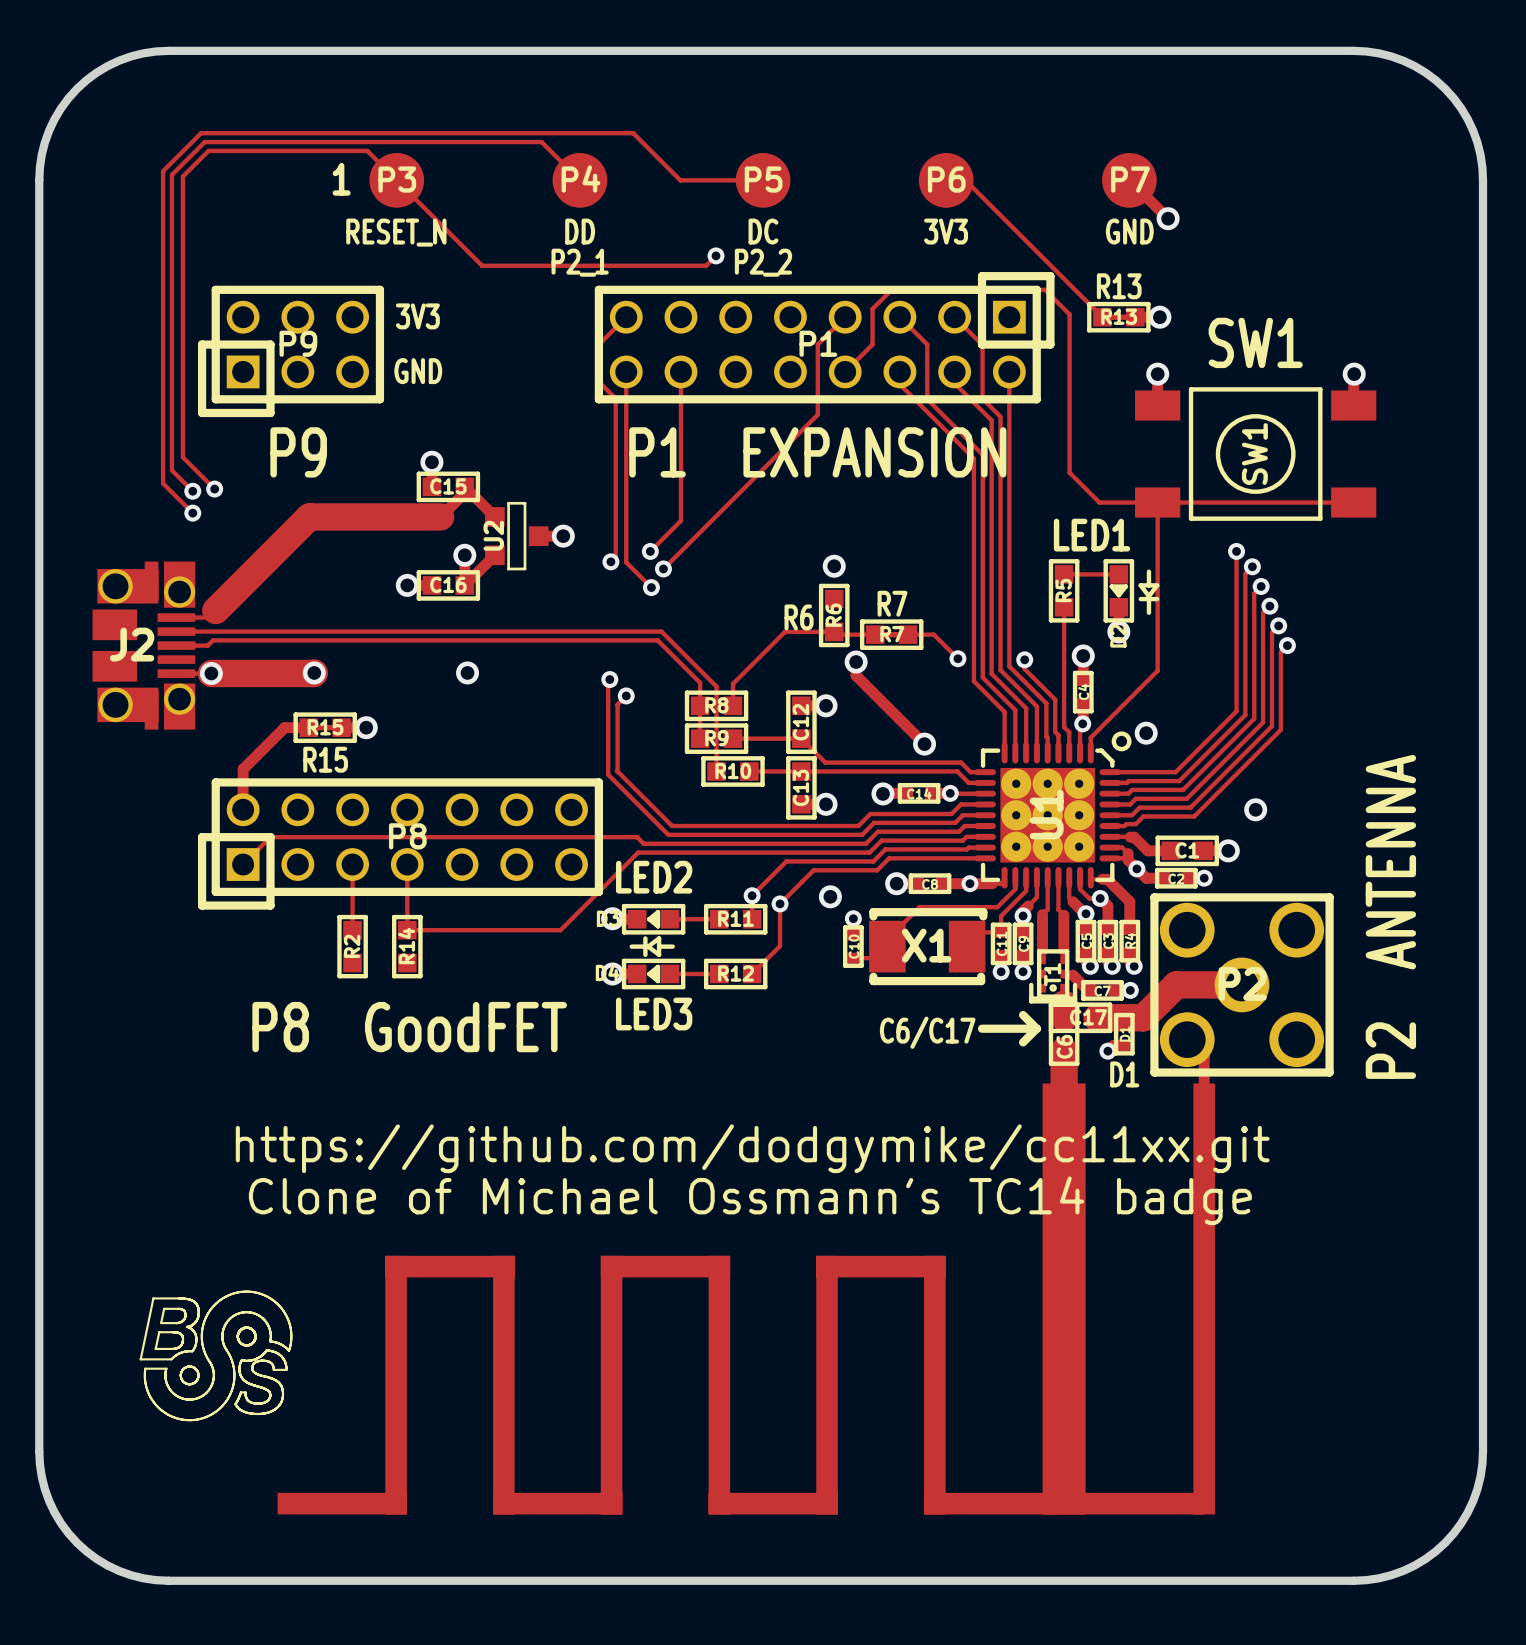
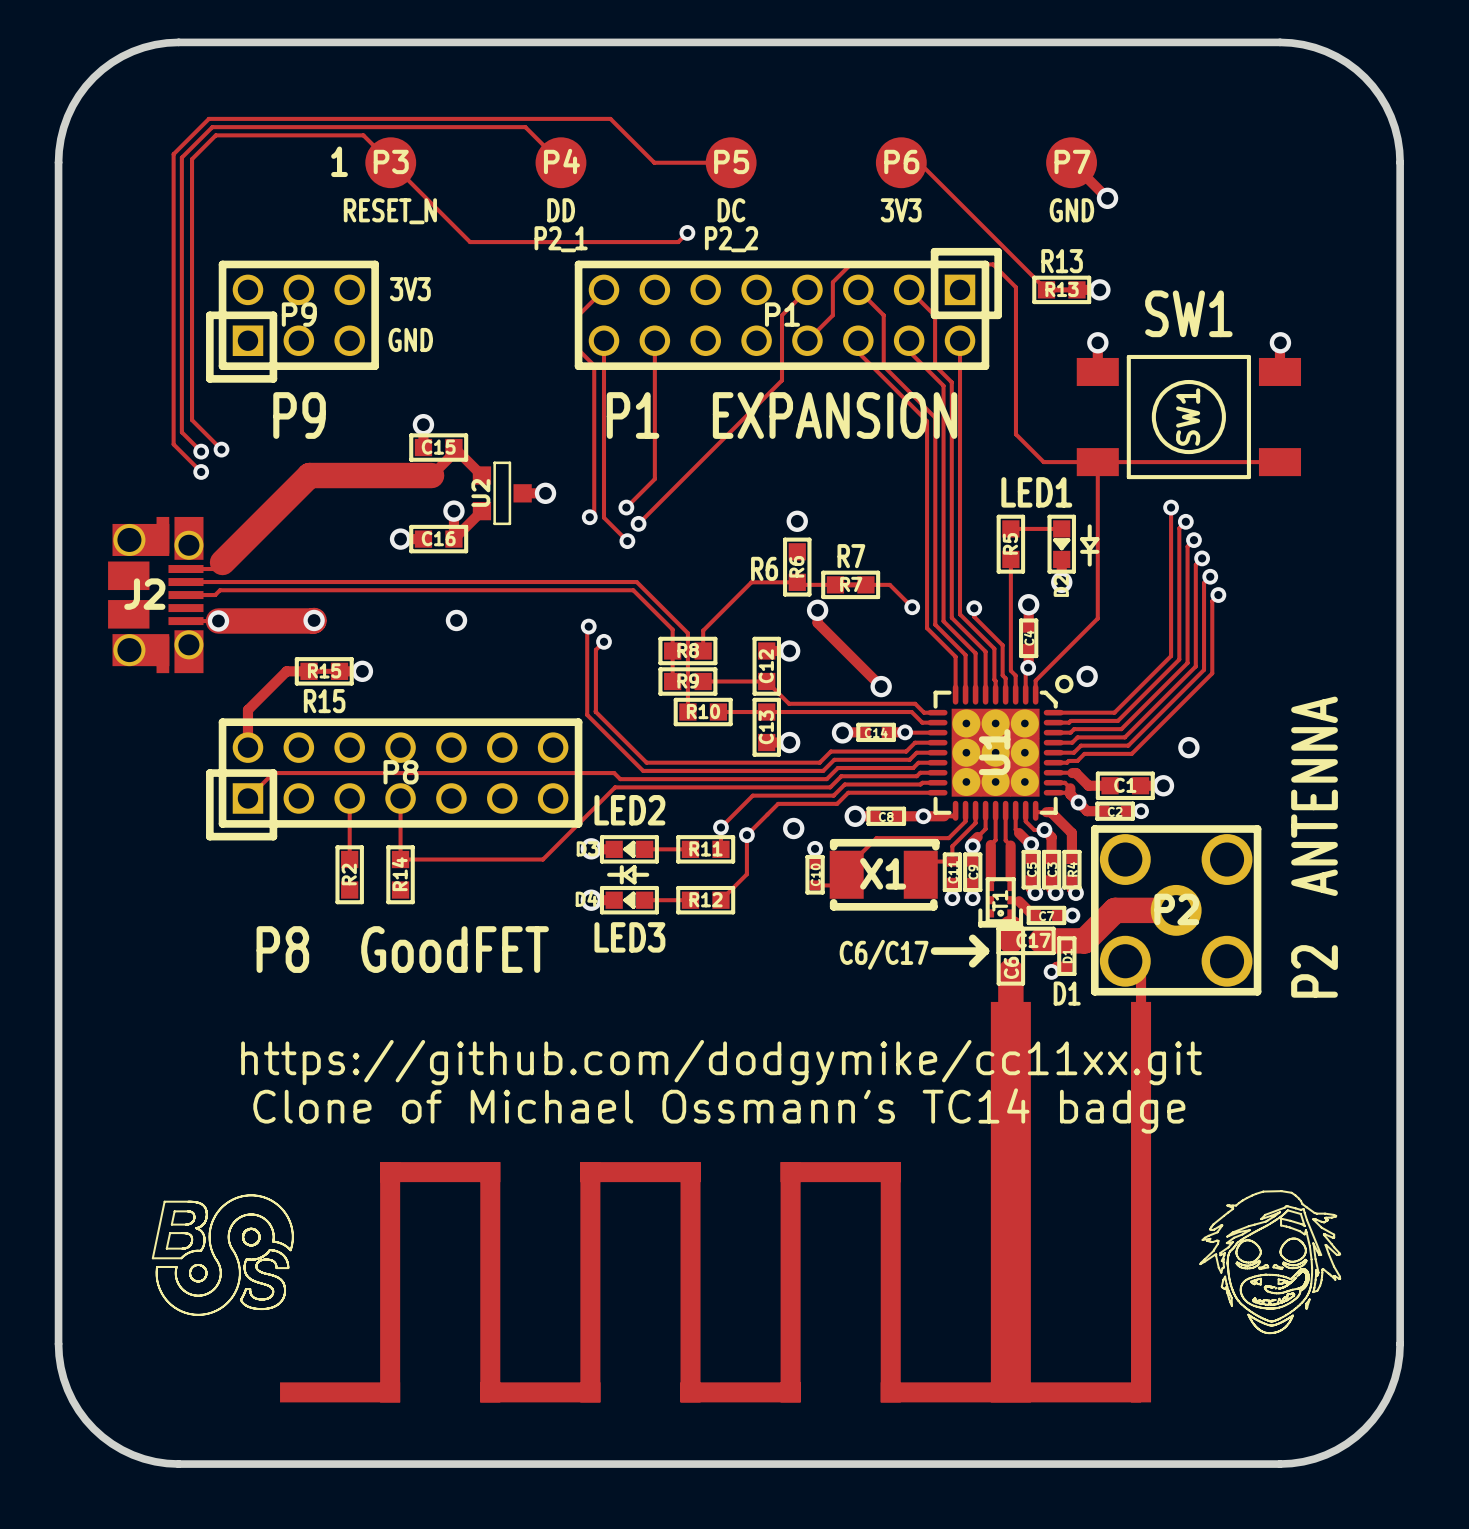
line: none -> (1281, 1191) (1263, 1191) (1246, 1198) (1236, 1205) (1227, 1205) (1233, 1208) (1213, 1224) (1209, 1229) (1214, 1229) (1222, 1225) (1217, 1231) (1202, 1239) (1210, 1238) (1207, 1240) (1218, 1240) (1213, 1250) (1200, 1264) (1216, 1254) (1221, 1272) (1223, 1267) (1223, 1259) (1221, 1261) (1224, 1253) (1220, 1255) (1220, 1252) (1232, 1242) (1226, 1243) (1249, 1230) (1227, 1236) (1232, 1232) (1266, 1221) (1279, 1212) (1261, 1219) (1265, 1214) (1287, 1206) (1303, 1209) (1321, 1255) (1319, 1255) (1313, 1243) (1318, 1272) (1317, 1275) (1316, 1270) (1313, 1292) (1317, 1290) (1320, 1285) (1322, 1269) (1335, 1279) (1333, 1276) (1340, 1278) (1325, 1244) (1336, 1254) (1340, 1254) (1323, 1234) (1332, 1237) (1334, 1234) (1321, 1227) (1313, 1218) (1323, 1222) (1328, 1220) (1325, 1217) (1336, 1215) (1314, 1213) (1291, 1192) (1281, 1191)
line: none -> (1287, 1210) (1277, 1219) (1238, 1242) (1230, 1251) (1228, 1256) (1229, 1280) (1236, 1298) (1251, 1311) (1270, 1321) (1286, 1315) (1300, 1304) (1307, 1294) (1311, 1283) (1311, 1259) (1305, 1230) (1304, 1234) (1281, 1225) (1281, 1218) (1304, 1226) (1300, 1214) (1287, 1210)
line: none -> (1298, 1239) (1289, 1239) (1281, 1247) (1280, 1253) (1287, 1260) (1297, 1260) (1304, 1254) (1305, 1247) (1298, 1239)
line: none -> (1241, 1242) (1250, 1240) (1258, 1247) (1260, 1254) (1255, 1260) (1246, 1262) (1238, 1257) (1236, 1250) (1241, 1242)
line: none -> (1305, 1259) (1304, 1264) (1296, 1267) (1288, 1267) (1283, 1263) (1296, 1265) (1305, 1259)
line: none -> (1259, 1260) (1256, 1265) (1249, 1268) (1242, 1267) (1236, 1263) (1248, 1265) (1259, 1260)
line: none -> (1265, 1265) (1268, 1267) (1259, 1269) (1259, 1267) (1265, 1265)
line: none -> (1274, 1265) (1282, 1267) (1282, 1269) (1273, 1267) (1274, 1265)
line: none -> (1300, 1273) (1299, 1273)
line: none -> (1264, 1274) (1246, 1279) (1241, 1285) (1240, 1290) (1243, 1297) (1248, 1302) (1266, 1308) (1279, 1307) (1292, 1301) (1305, 1286) (1308, 1278) (1307, 1271) (1303, 1269) (1300, 1269) (1290, 1279) (1266, 1274)
line: none -> (1297, 1276) (1297, 1276)
line: none -> (1225, 1276) (1221, 1286) (1224, 1288) (1225, 1287) (1231, 1305) (1231, 1297) (1225, 1276)
line: none -> (1295, 1277) (1284, 1286)
line: none -> (1261, 1278) (1256, 1279) (1256, 1283) (1260, 1284) (1261, 1278)
line: none -> (1255, 1280) (1253, 1280) (1250, 1281) (1254, 1284) (1255, 1280)
line: none -> (1278, 1279) (1278, 1284) (1283, 1283) (1284, 1280) (1278, 1279)
line: none -> (1284, 1280) (1286, 1283) (1288, 1282) (1286, 1281) (1284, 1280)
line: none -> (1266, 1286) (1274, 1286)
line: none -> (1264, 1288) (1267, 1291) (1276, 1293) (1298, 1288)
line: none -> (1276, 1287) (1275, 1288)
line: none -> (1290, 1294) (1287, 1294) (1287, 1300) (1293, 1295)
line: none -> (1292, 1293) (1291, 1293)
line: none -> (1293, 1293) (1294, 1294)
line: none -> (1284, 1297) (1282, 1302) (1287, 1300)
line: none -> (1279, 1298) (1281, 1302) (1277, 1303) (1277, 1303) (1279, 1298)
line: none -> (1275, 1299) (1270, 1301)
line: none -> (1258, 1302) (1259, 1299) (1263, 1302) (1263, 1300) (1269, 1300) (1269, 1304) (1263, 1303)
line: none -> (1258, 1302) (1254, 1298) (1253, 1301) (1257, 1303) (1262, 1303)
line: none -> (1276, 1304) (1271, 1304)
line: none -> (1307, 1307) (1309, 1299) (1306, 1303) (1307, 1307)
line: none -> (1248, 1314) (1258, 1328) (1269, 1333) (1283, 1328) (1292, 1315) (1271, 1325) (1248, 1314)

